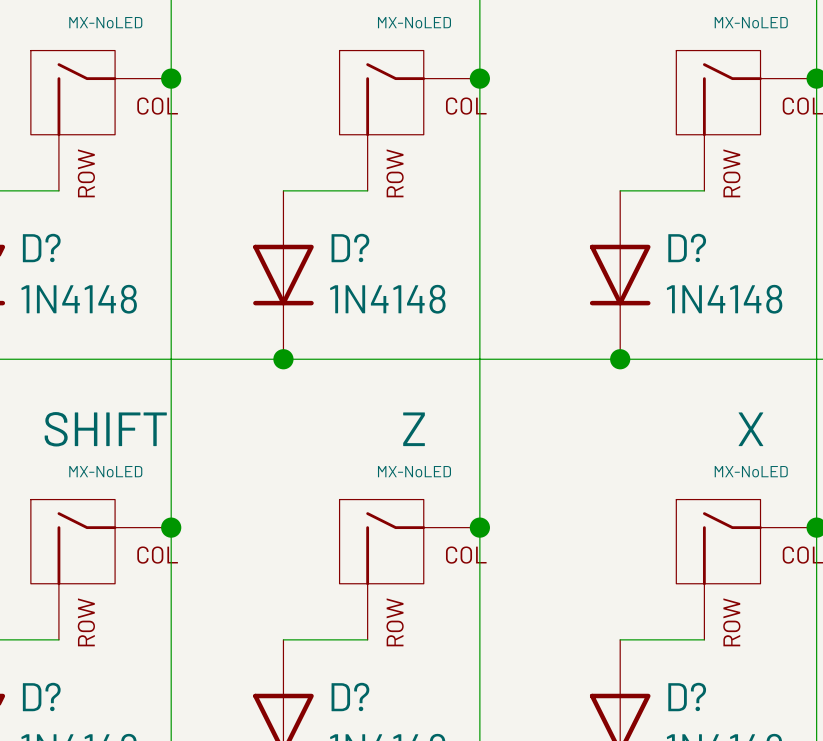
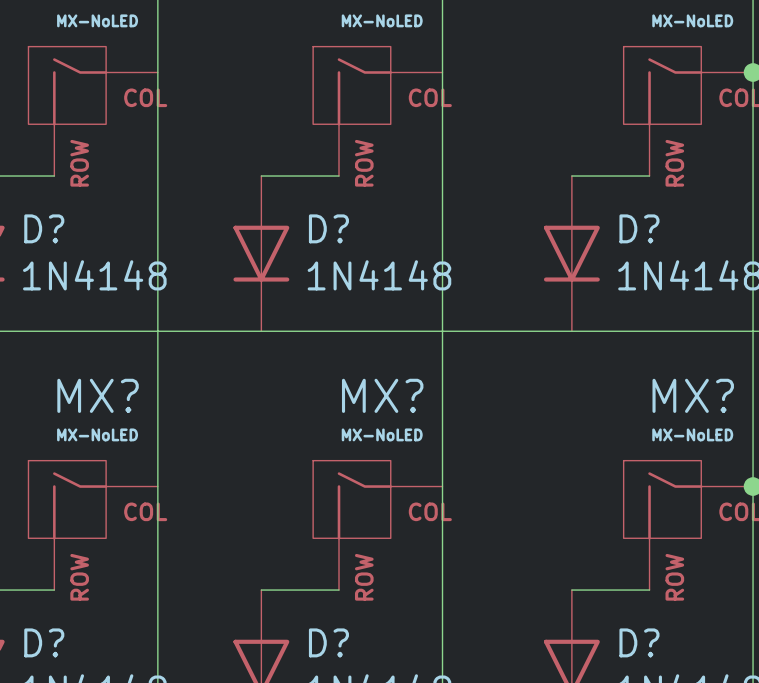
junction: (171, 78) -> none
junction: (479, 78) -> none
junction: (283, 359) -> none
junction: (620, 359) -> none
SHIFT name: SHIFT (105, 429) -> MX? (98, 395)
Z name: Z (414, 429) -> MX? (382, 395)
X name: X (750, 429) -> MX? (693, 395)
junction: (171, 527) -> none
junction: (479, 527) -> none

